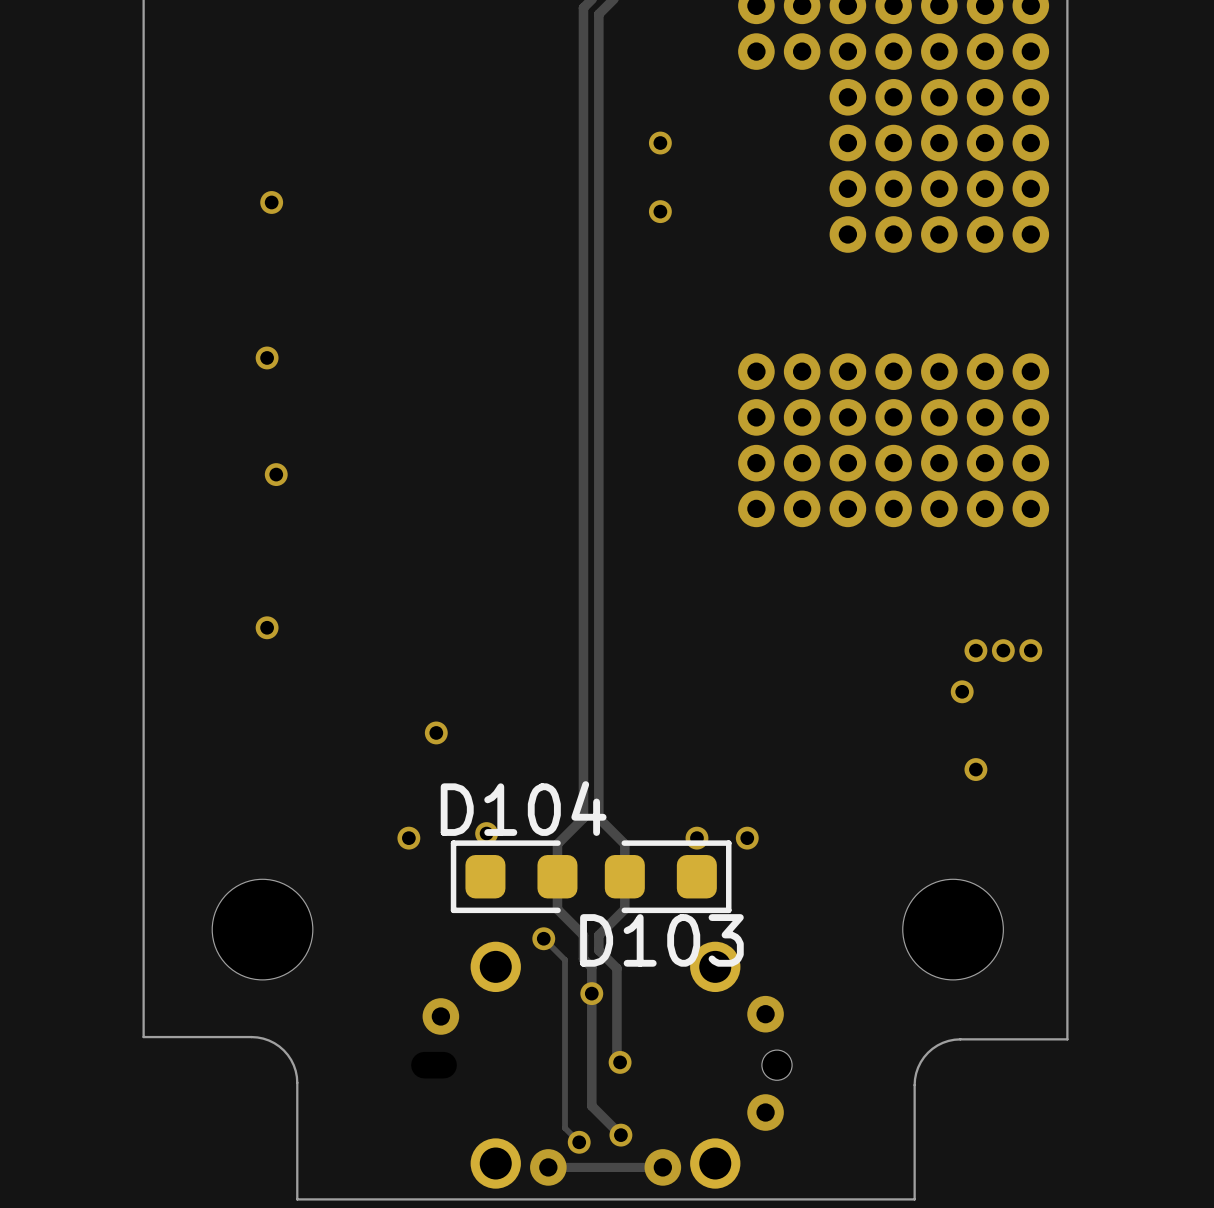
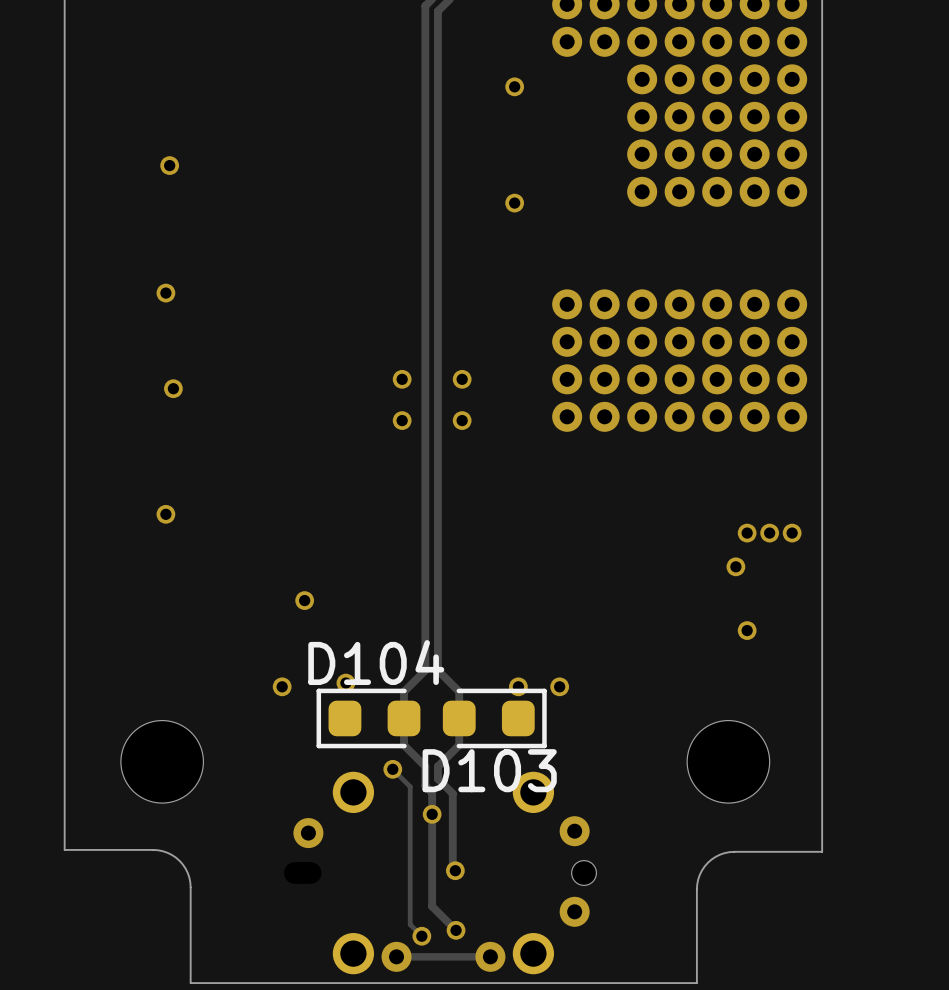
via position: (660, 143) -> (514, 86)
via position: (660, 211) -> (514, 203)
via: none -> (402, 379)
via: none -> (462, 379)
via: none -> (402, 420)
via: none -> (462, 420)

